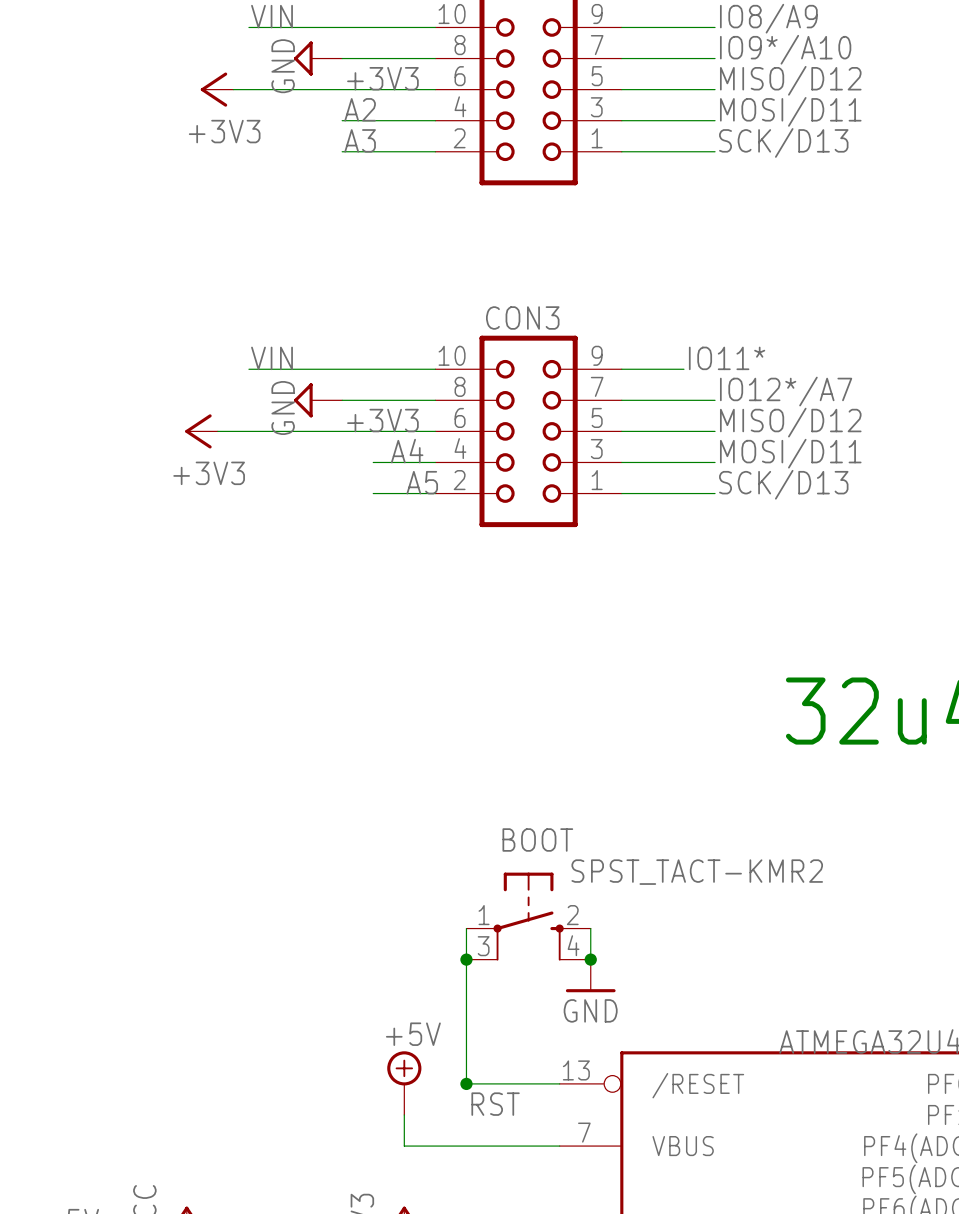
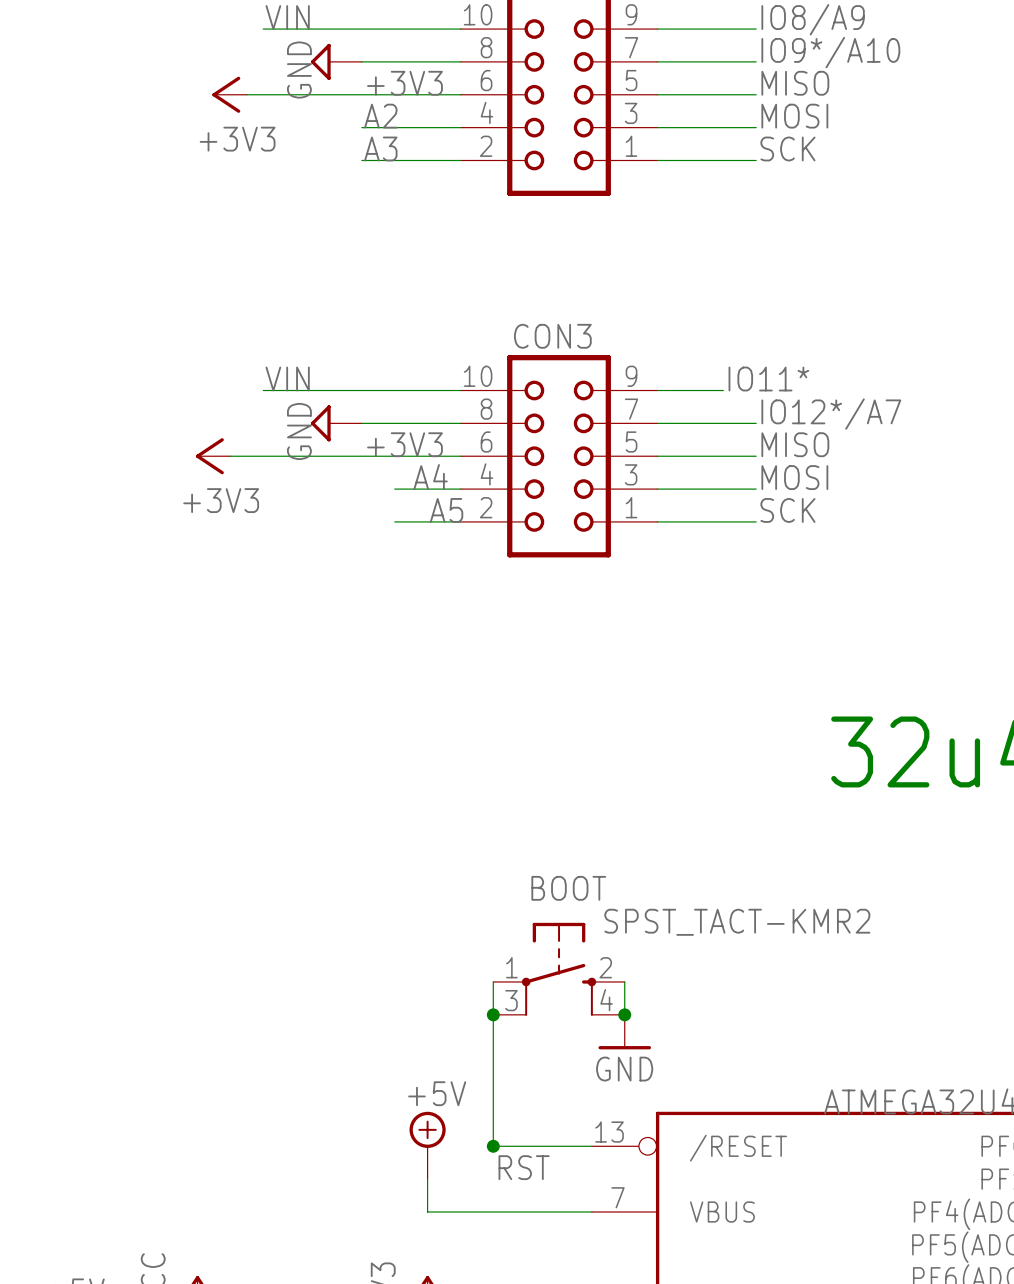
label: MISO/D12 (790, 80) -> MISO (795, 83)
label: MOSI/D11 (790, 111) -> MOSI (794, 116)
label: SCK/D13 (783, 142) -> SCK (787, 148)
label: MISO/D12 (790, 422) -> MISO (795, 444)
label: MOSI/D11 (790, 453) -> MOSI (794, 477)
label: SCK/D13 (783, 484) -> SCK (787, 510)

